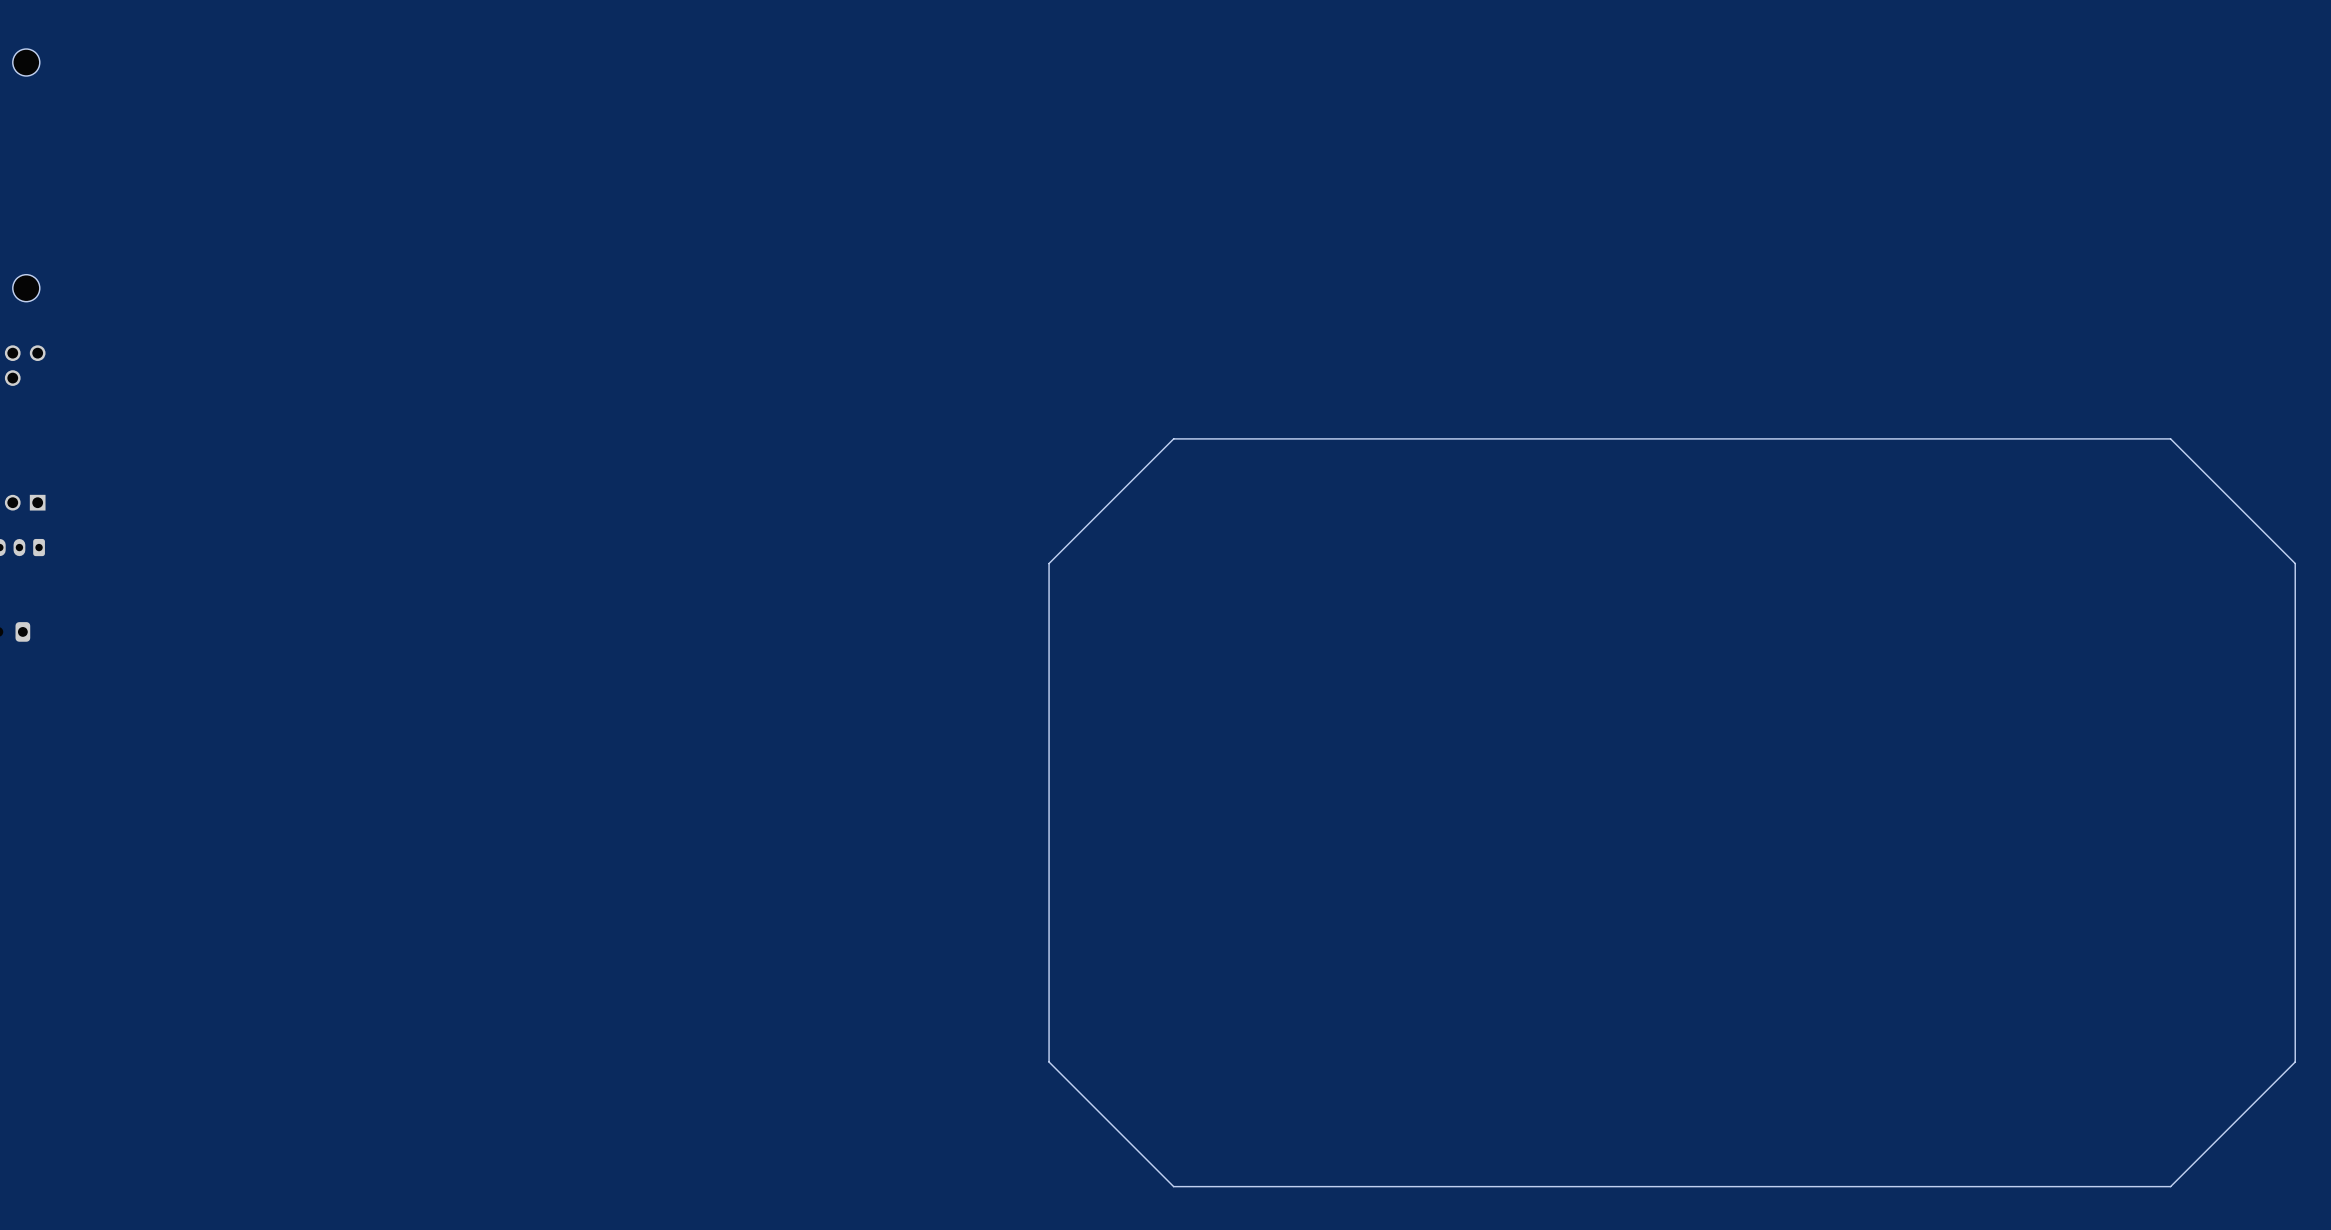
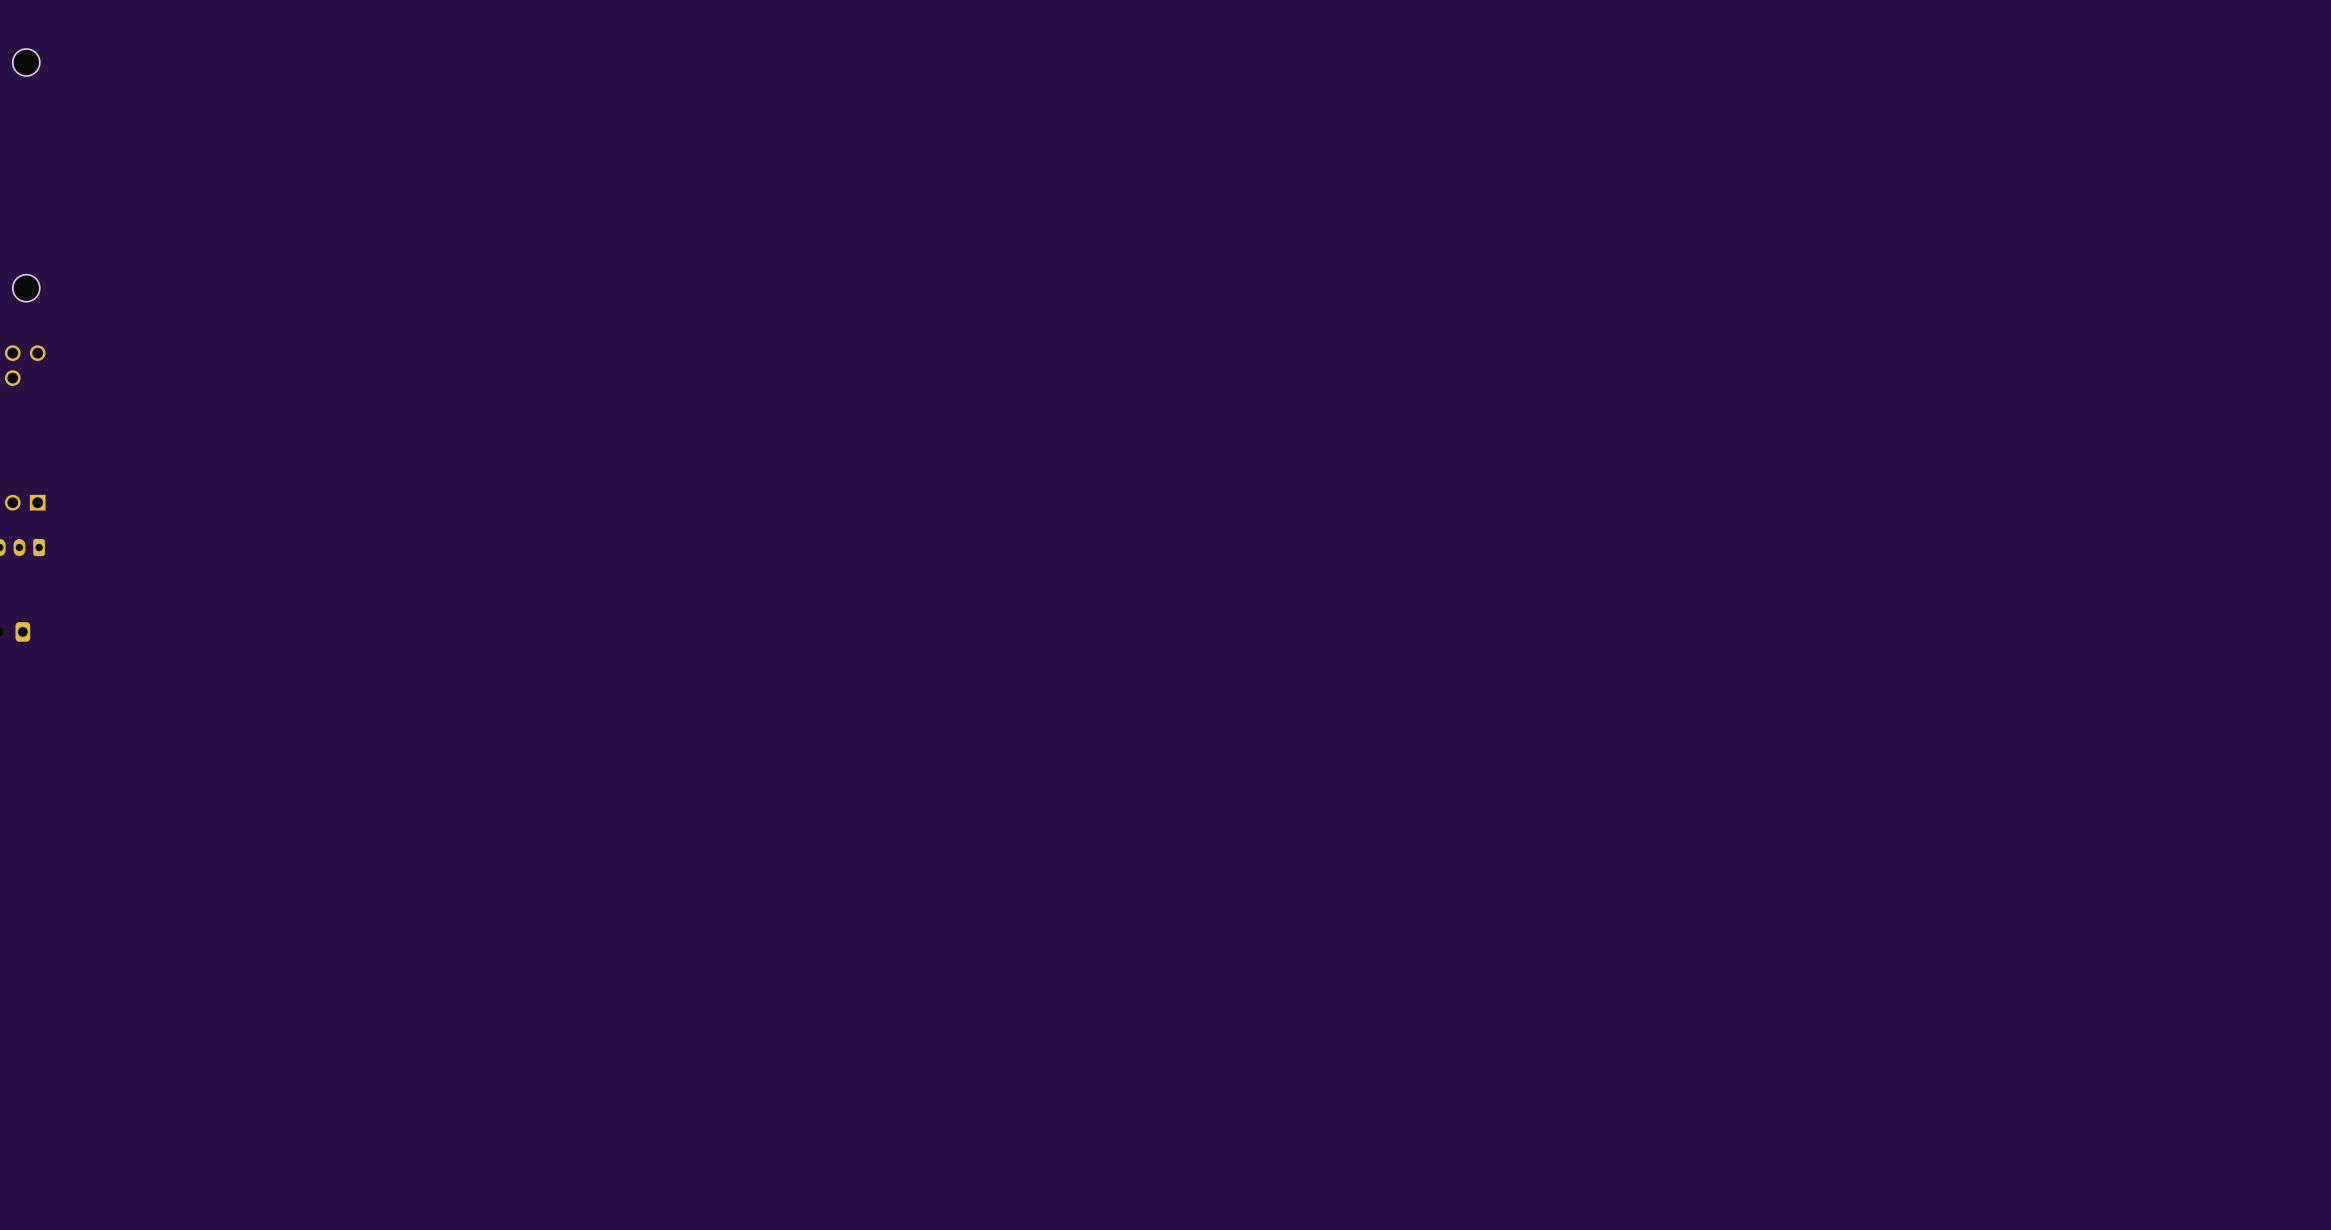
board edge: (2170, 438) (2295, 563) (2295, 1062) (2170, 1186) (1173, 1186) (1049, 1062) (1049, 563) (1173, 438) (2170, 438) -> none

